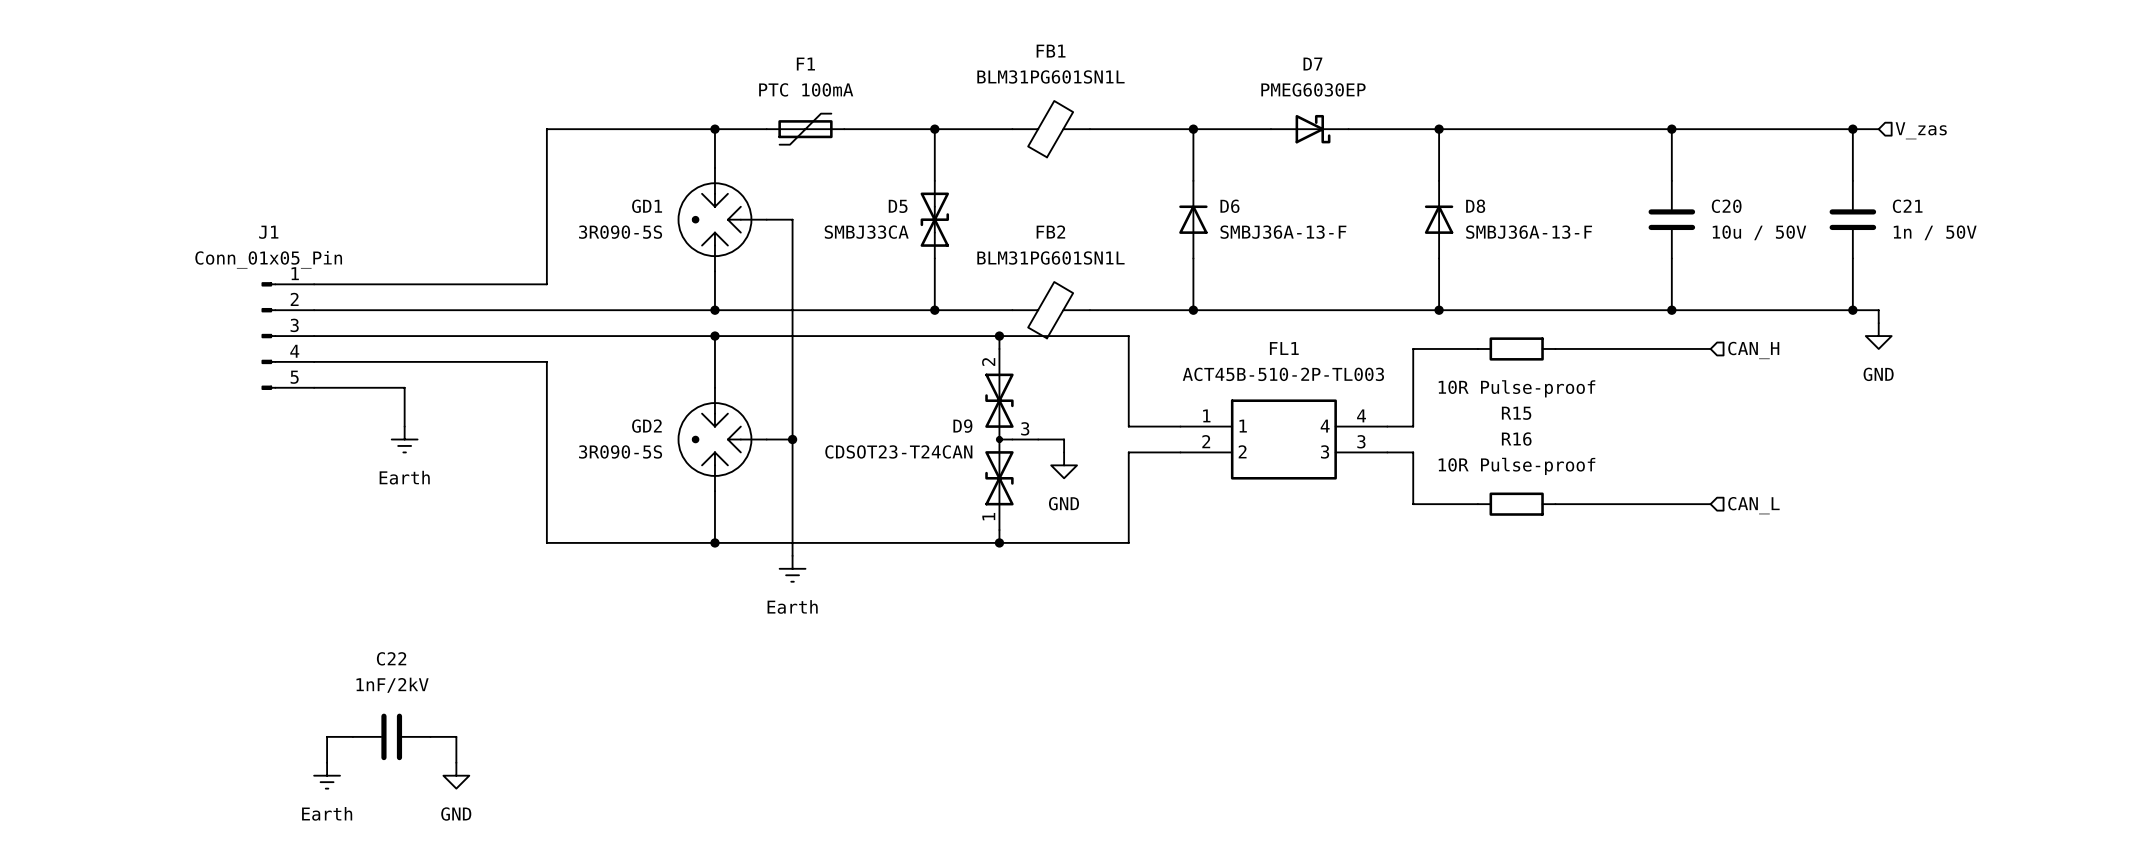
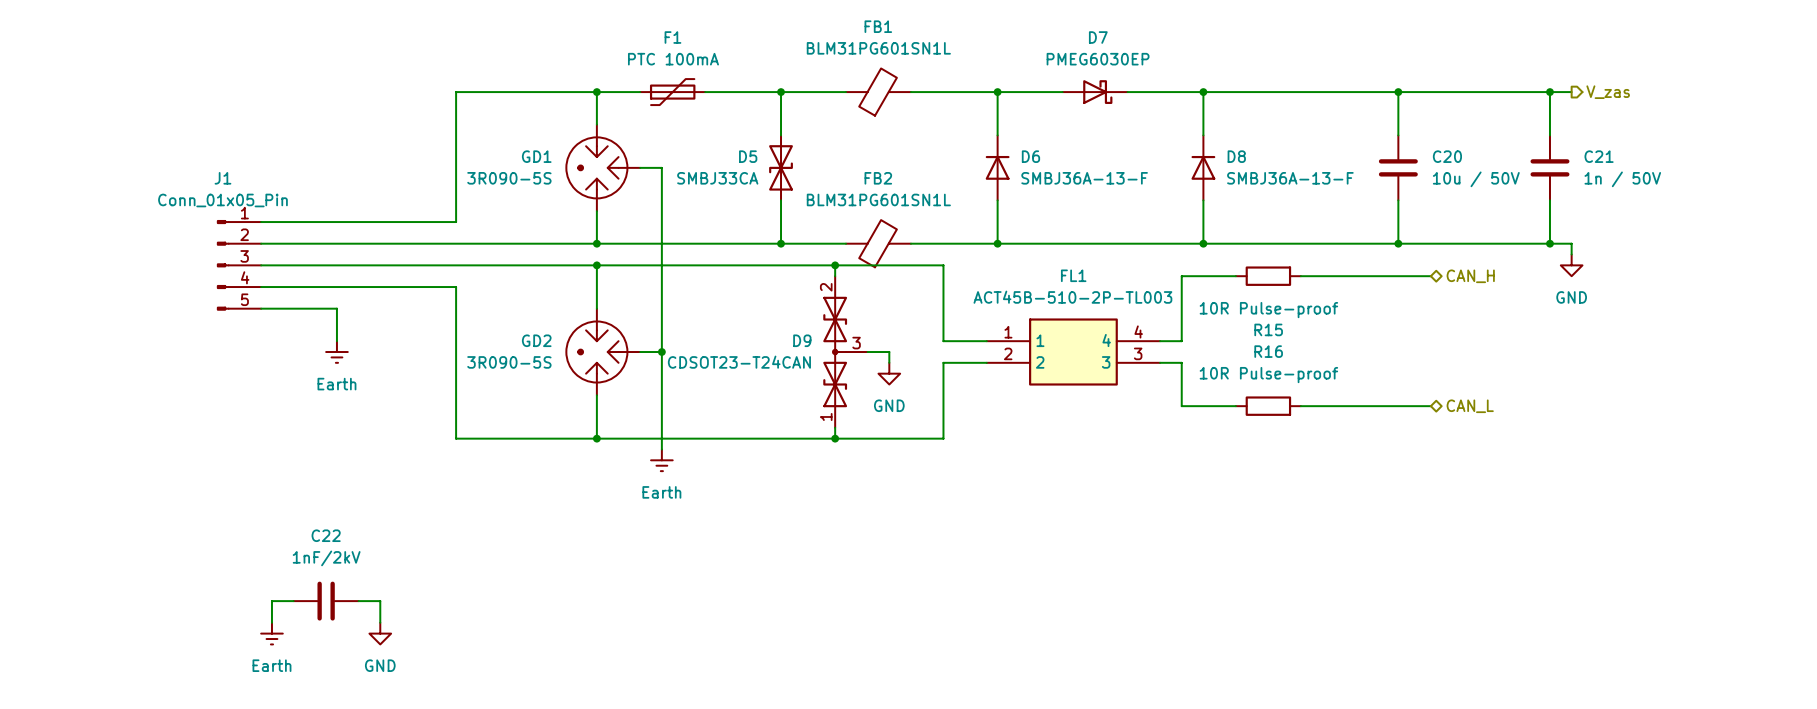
hierarchical label shape: input (1921, 130) -> output (1608, 92)
hierarchical label shape: input (1753, 350) -> bidirectional (1470, 276)
hierarchical label shape: input (1753, 505) -> bidirectional (1470, 406)

